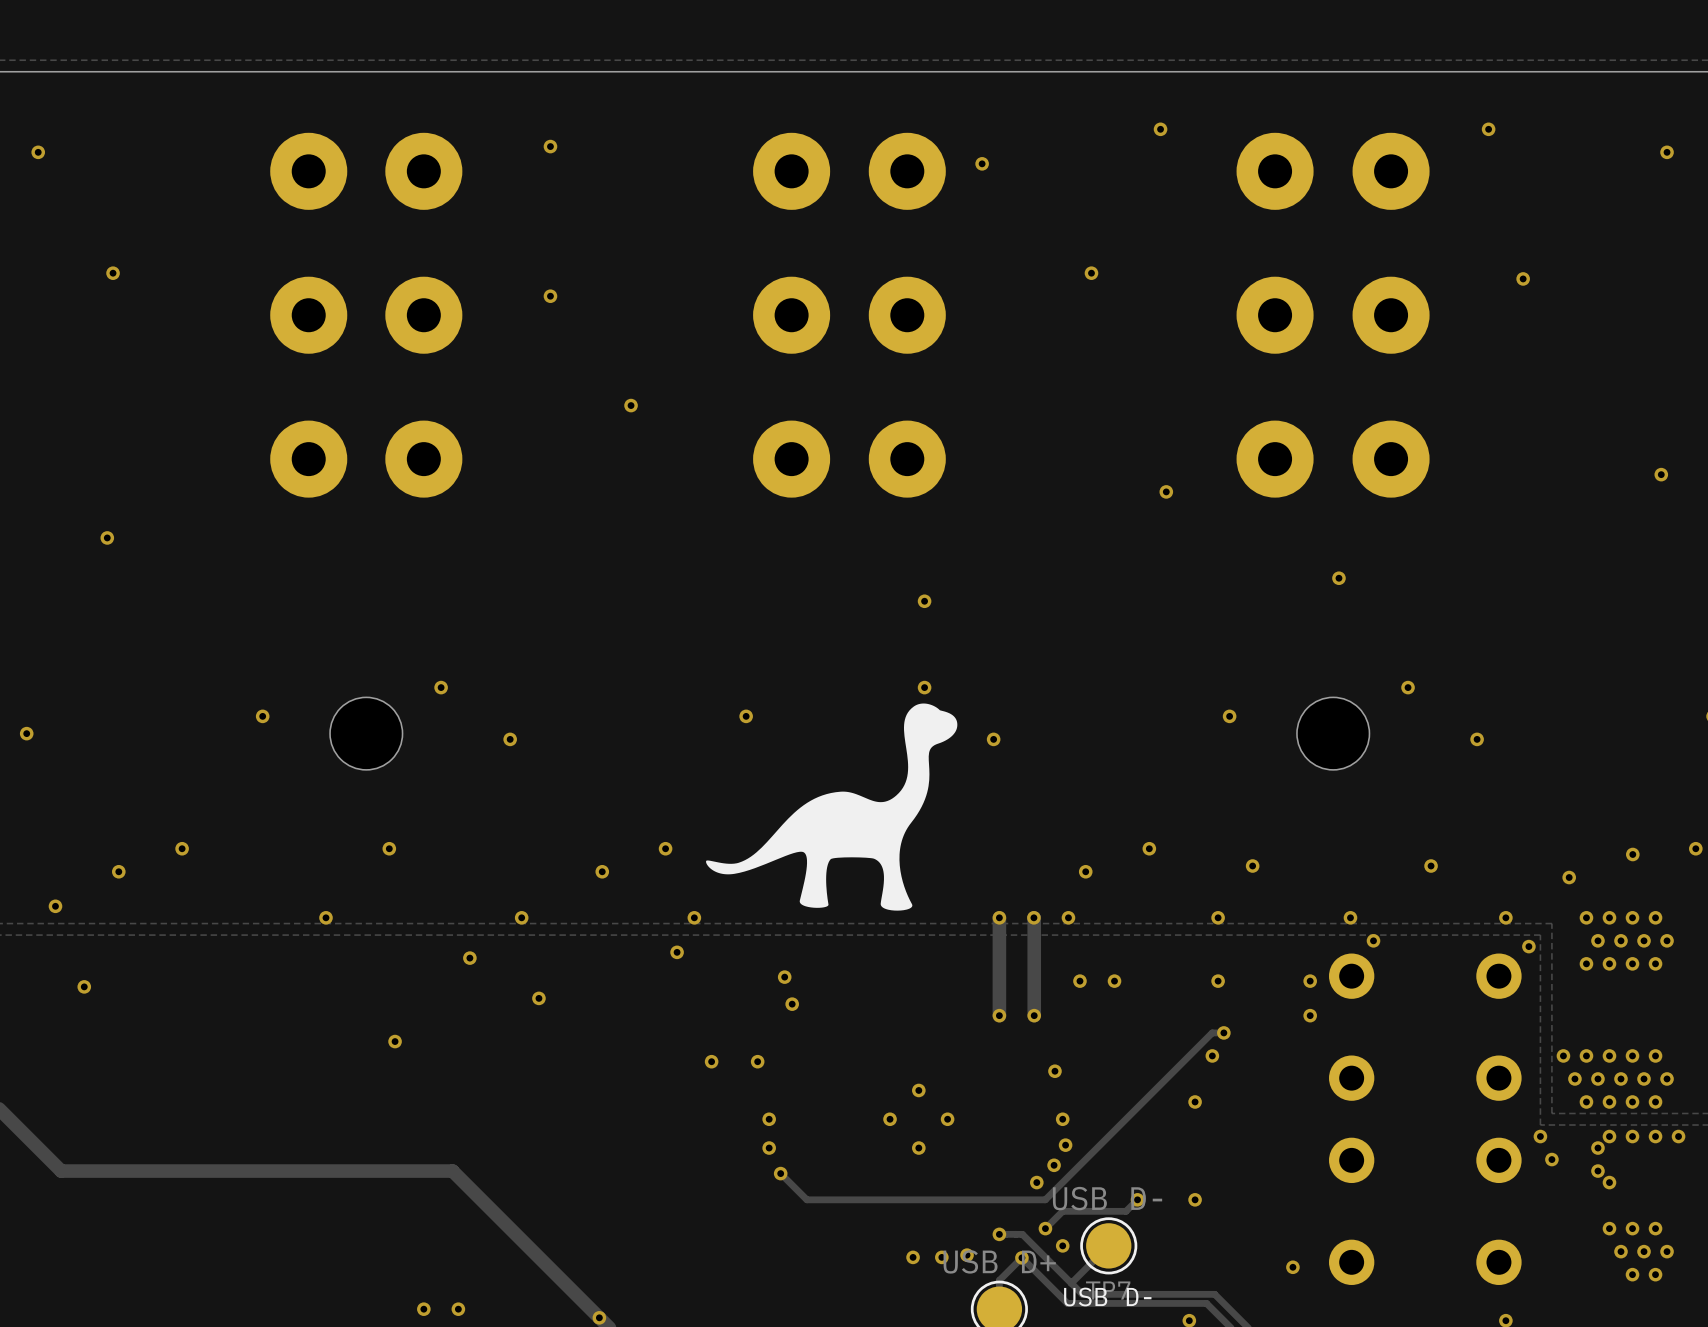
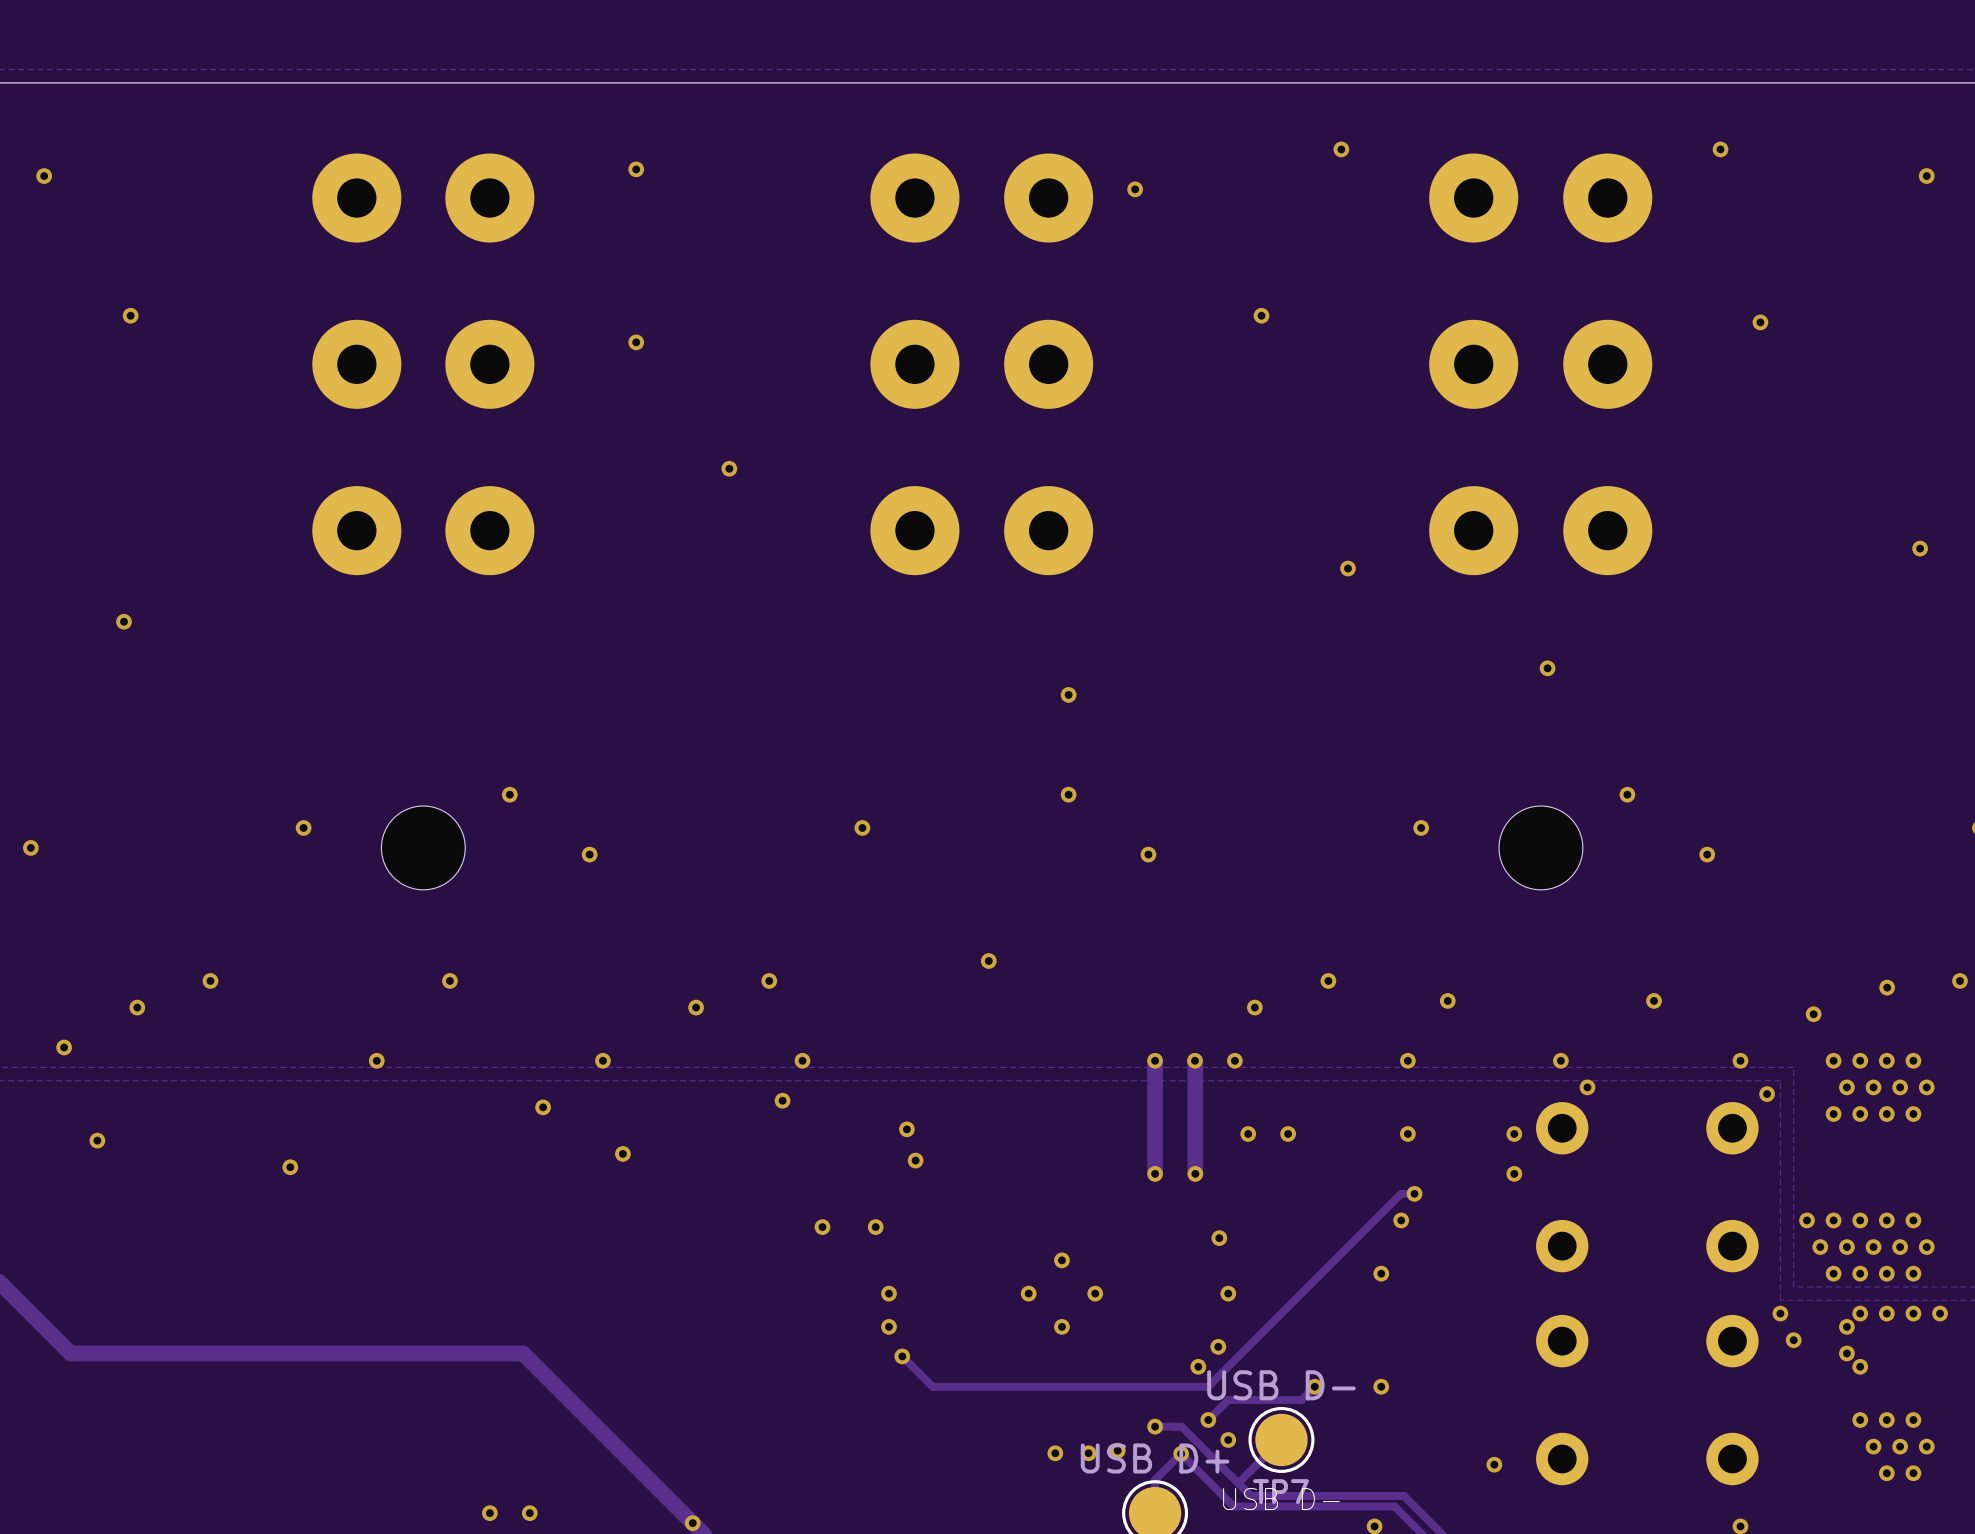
drawing: [706, 703, 958, 911] -> none
via: none -> (290, 1167)
via: (395, 1041) -> none
via: (1065, 1145) -> none

